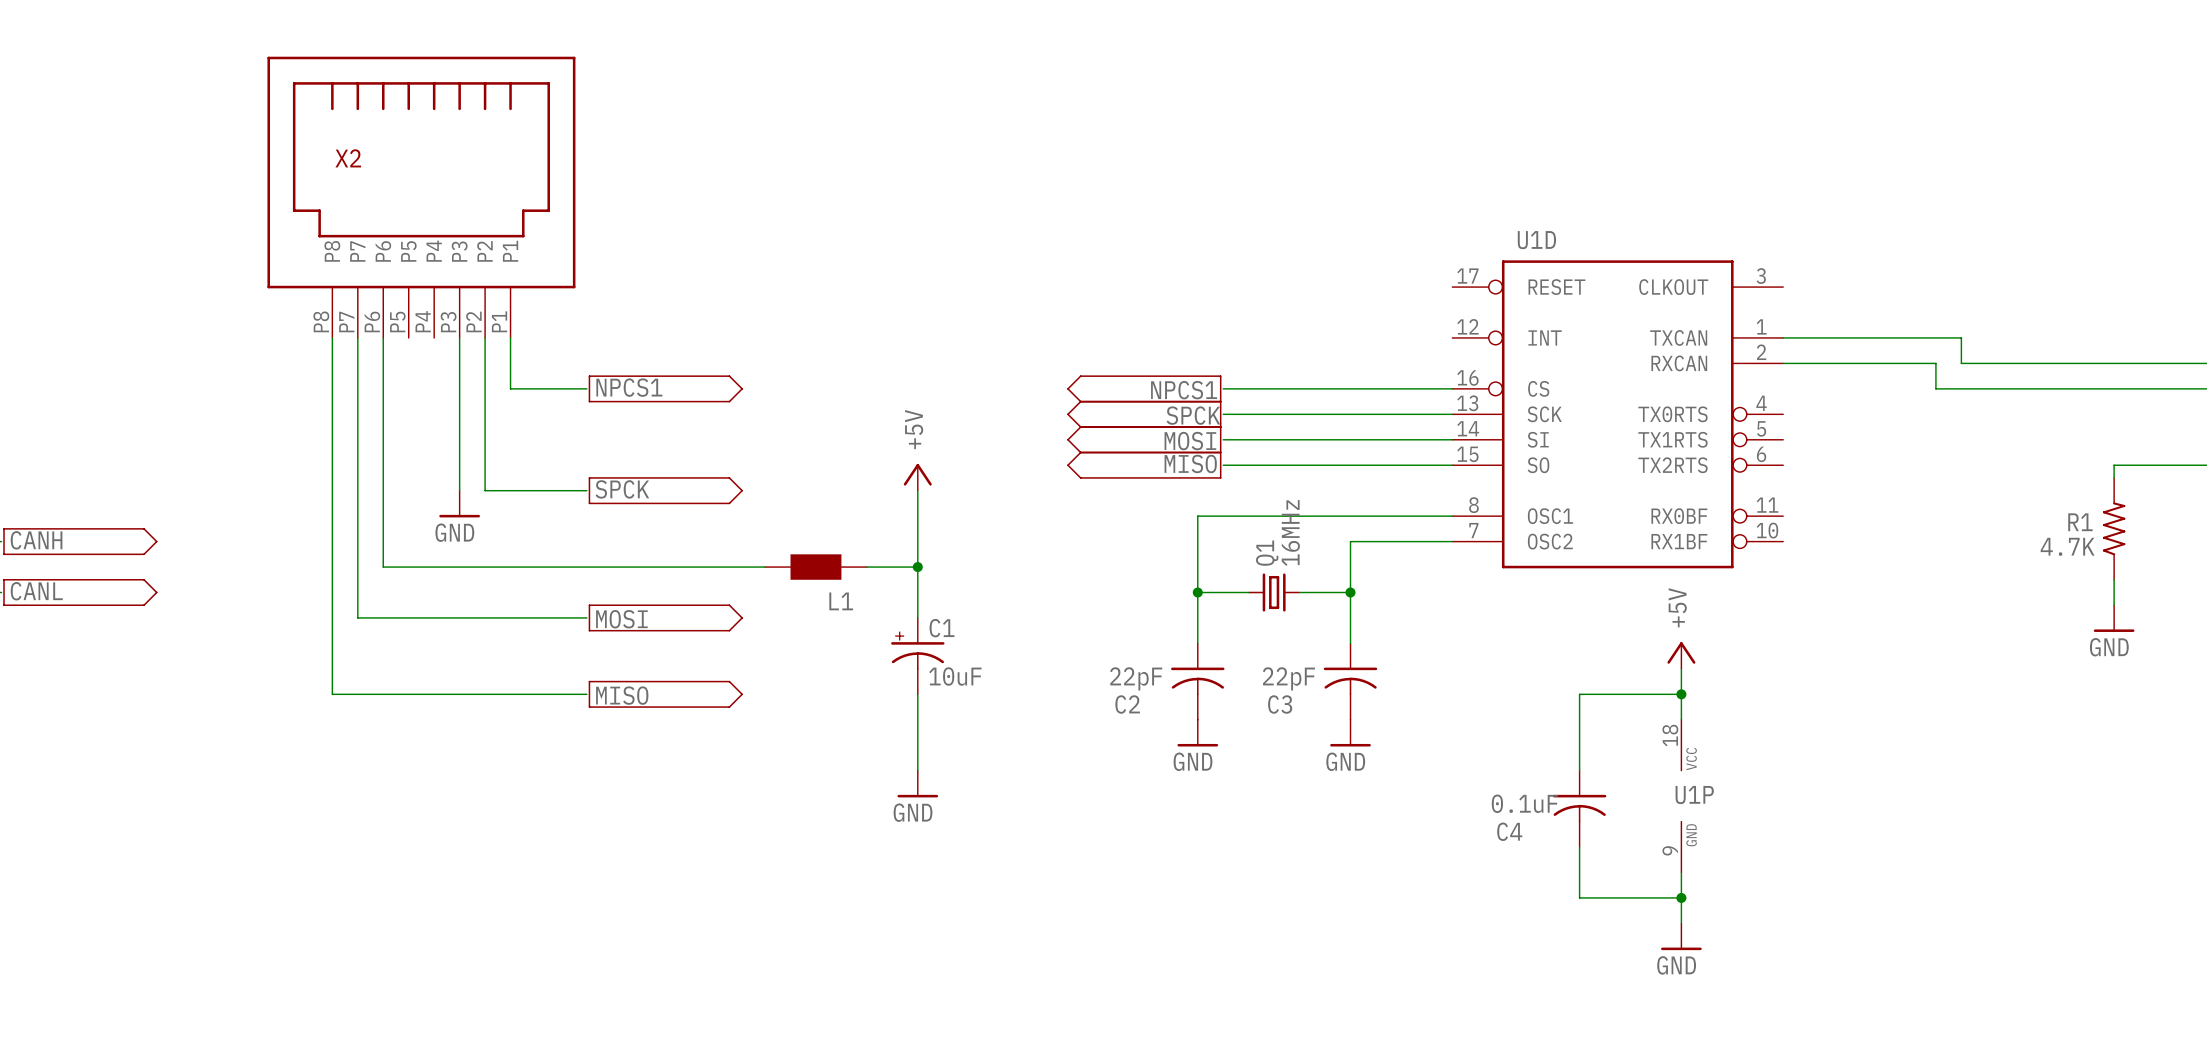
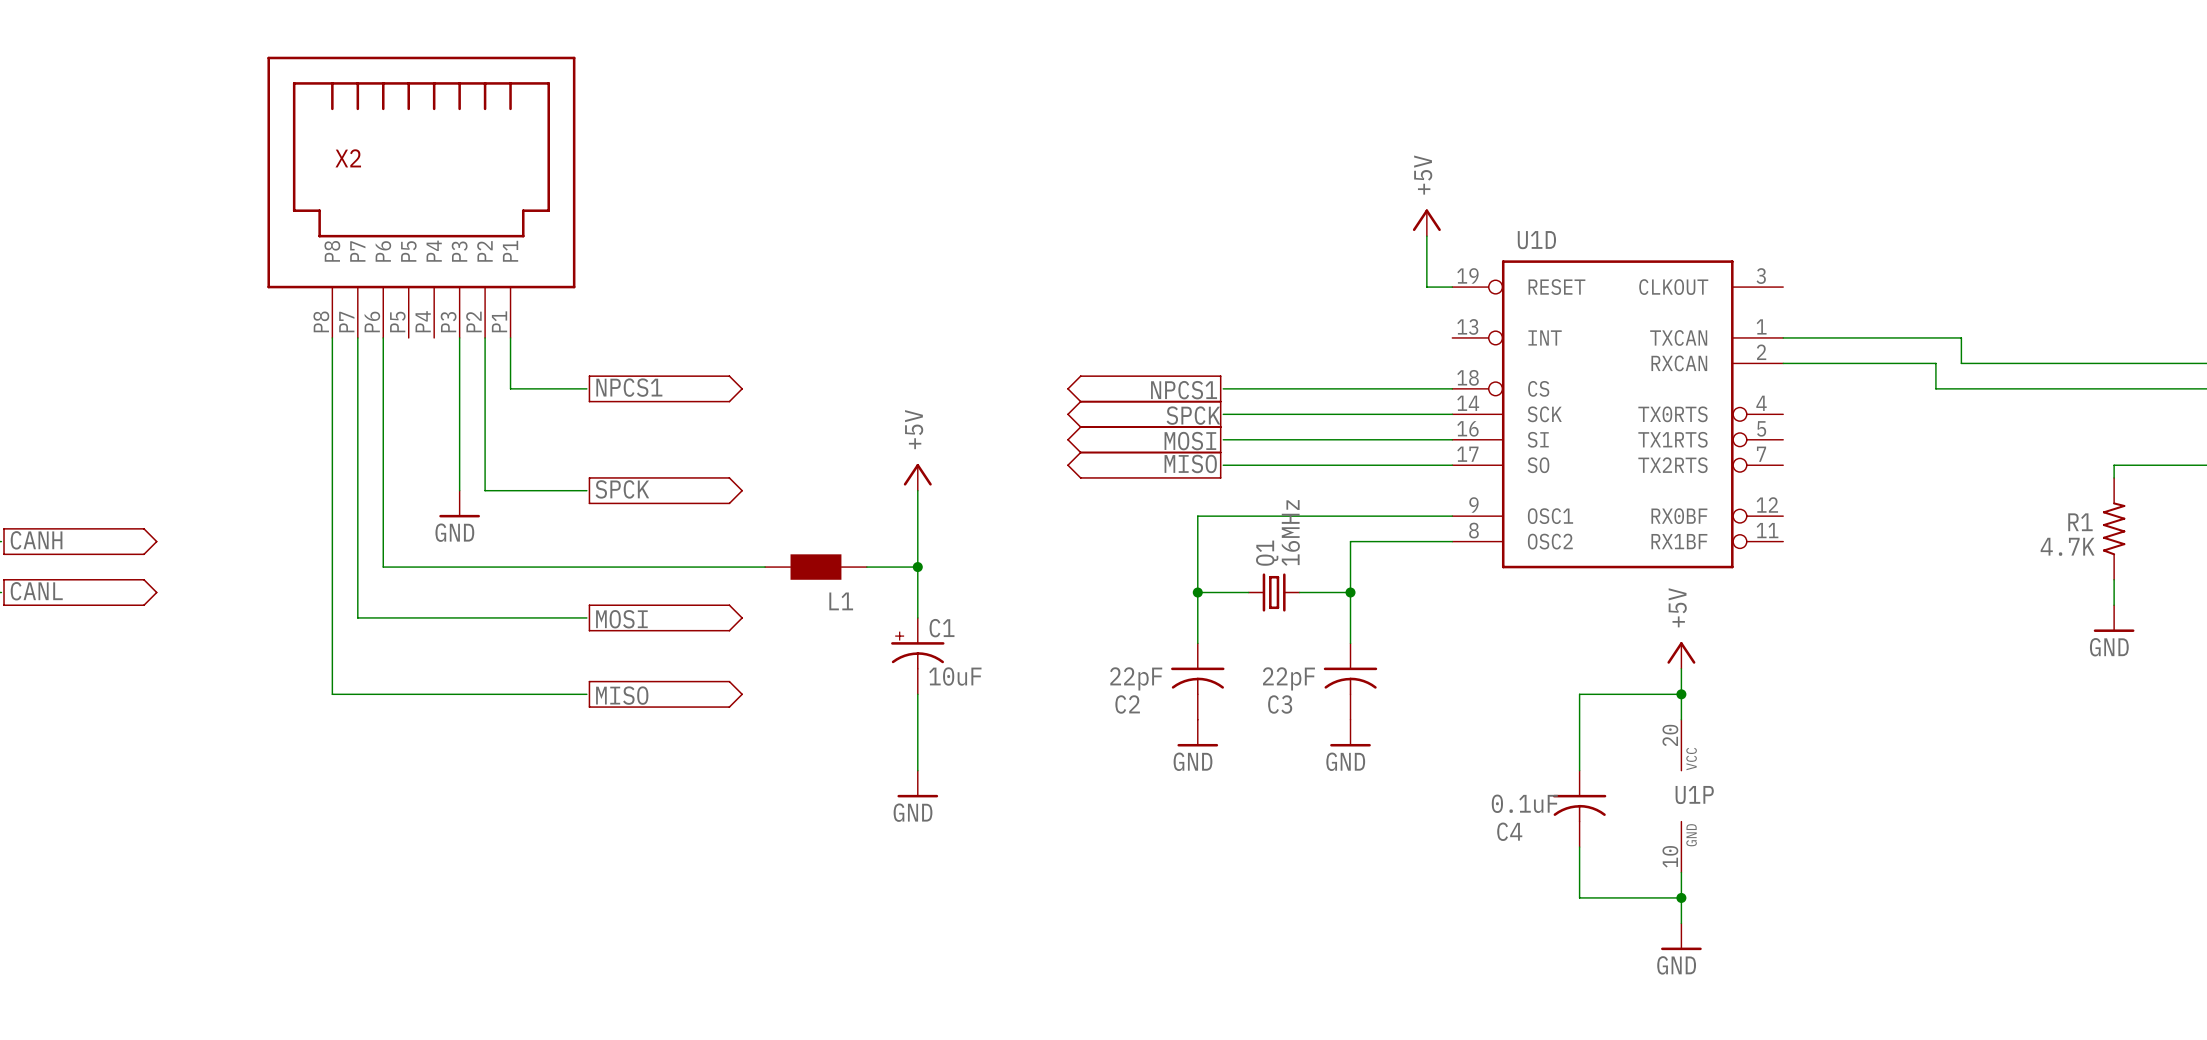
power symbol: none -> +5V (1426, 222)
wire: none -> (1426, 236) (1426, 287) (1452, 287)
U1D symbol: [1452, 260, 1784, 569] -> [1452, 260, 1784, 569]
U1P pin number: 18 (1670, 735) -> 20 (1670, 735)
U1P pin number: 9 (1670, 850) -> 10 (1670, 856)

